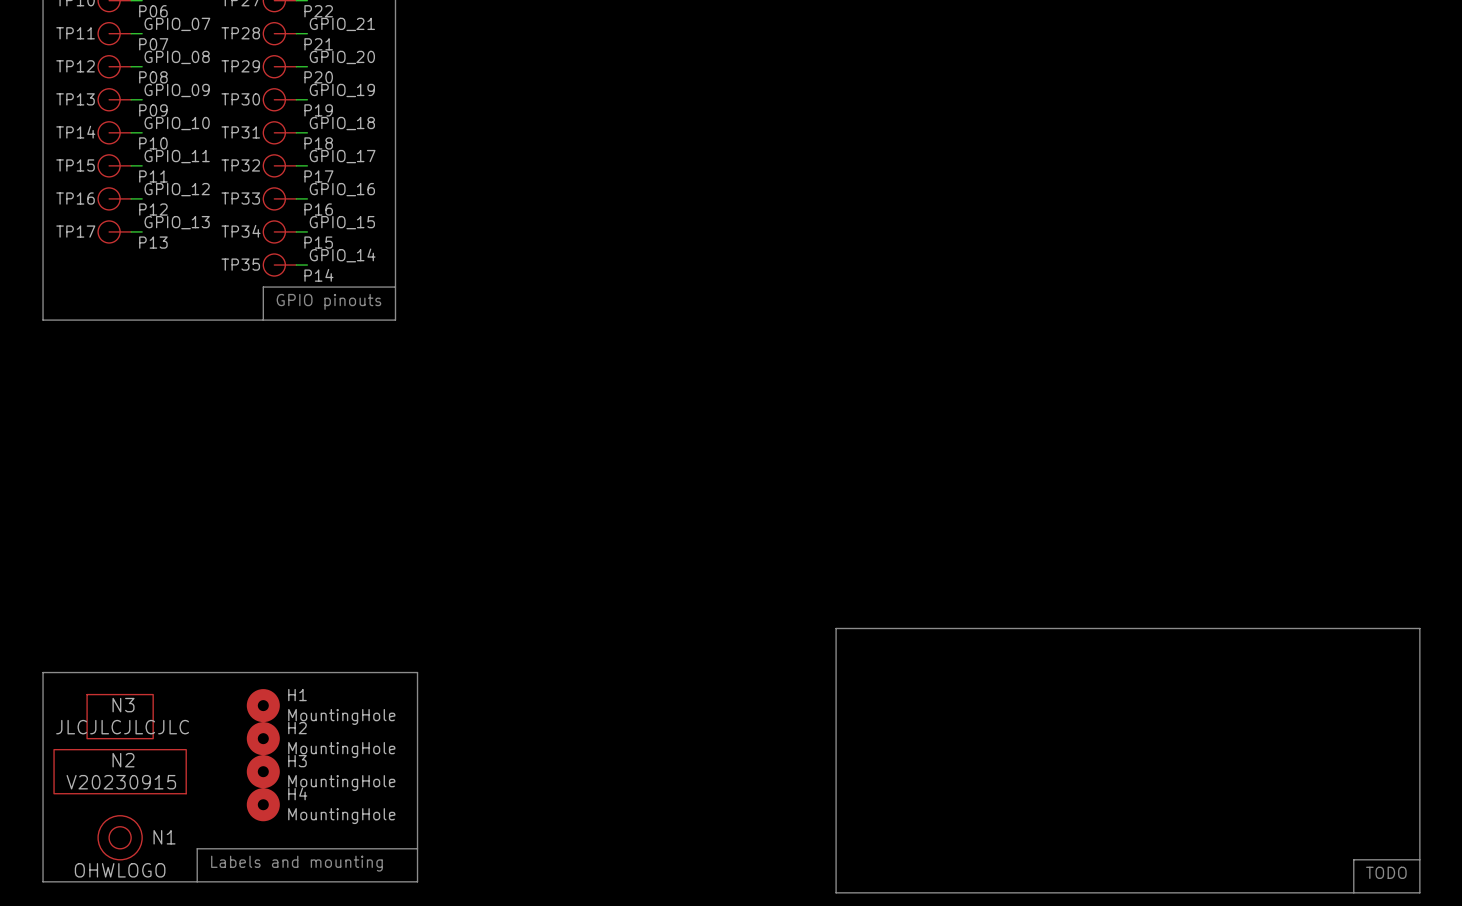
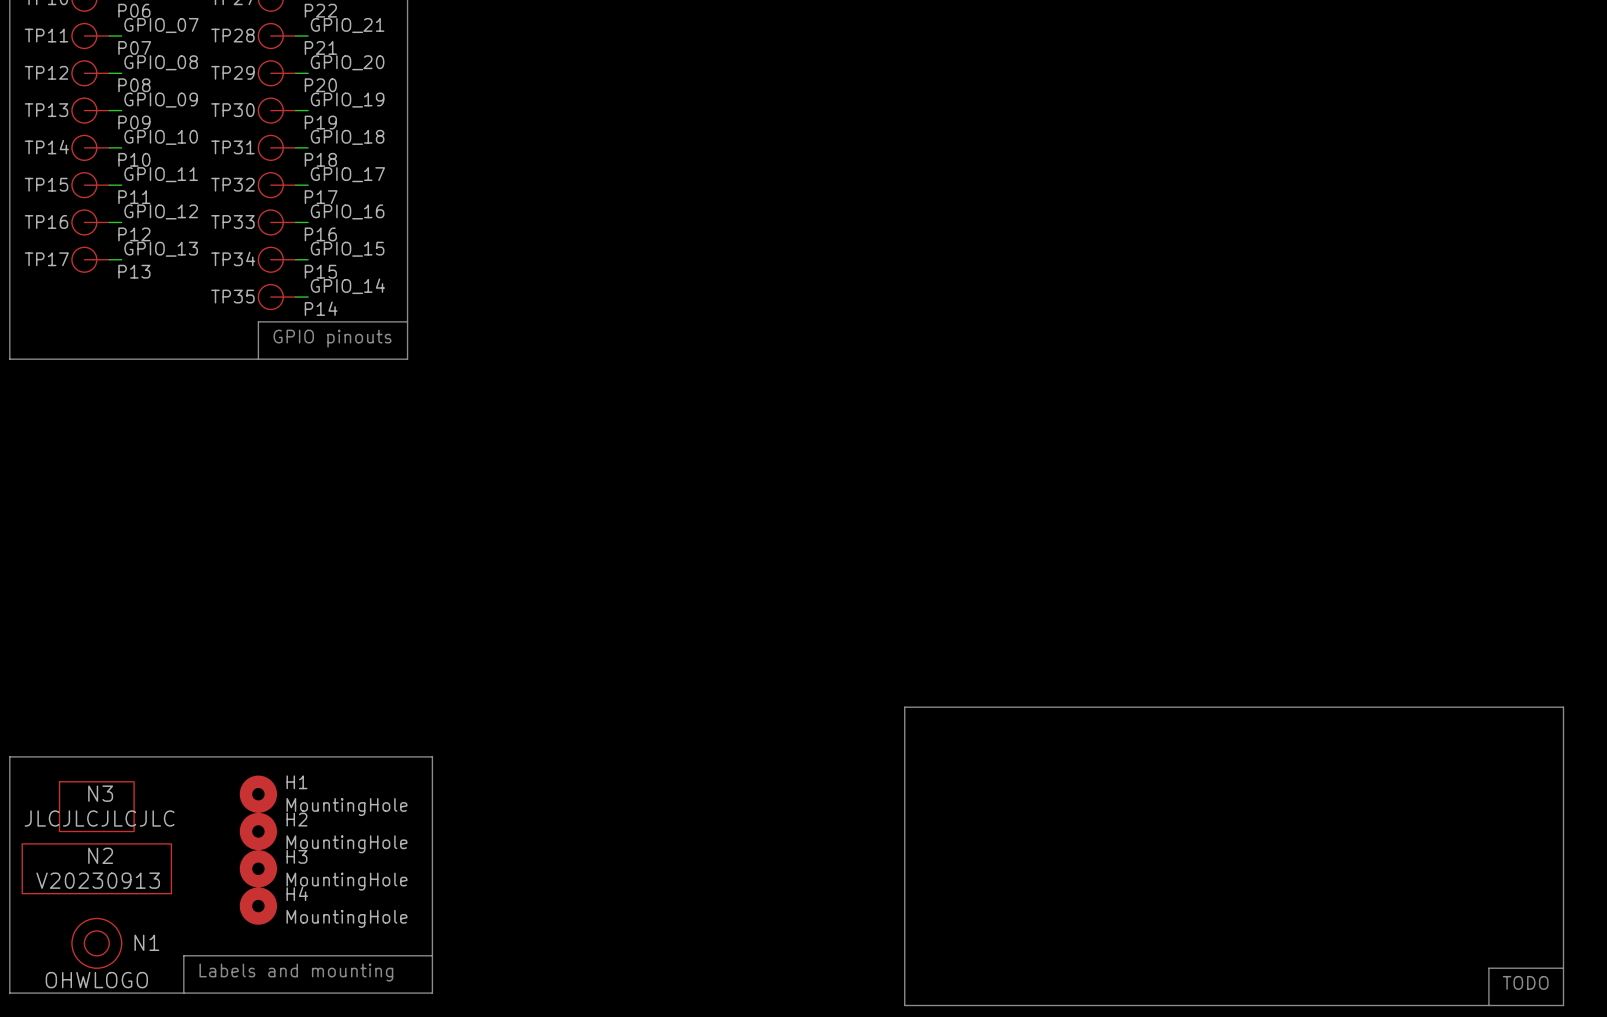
N2 value: V20230915 (121, 782) -> V20230913 (98, 880)

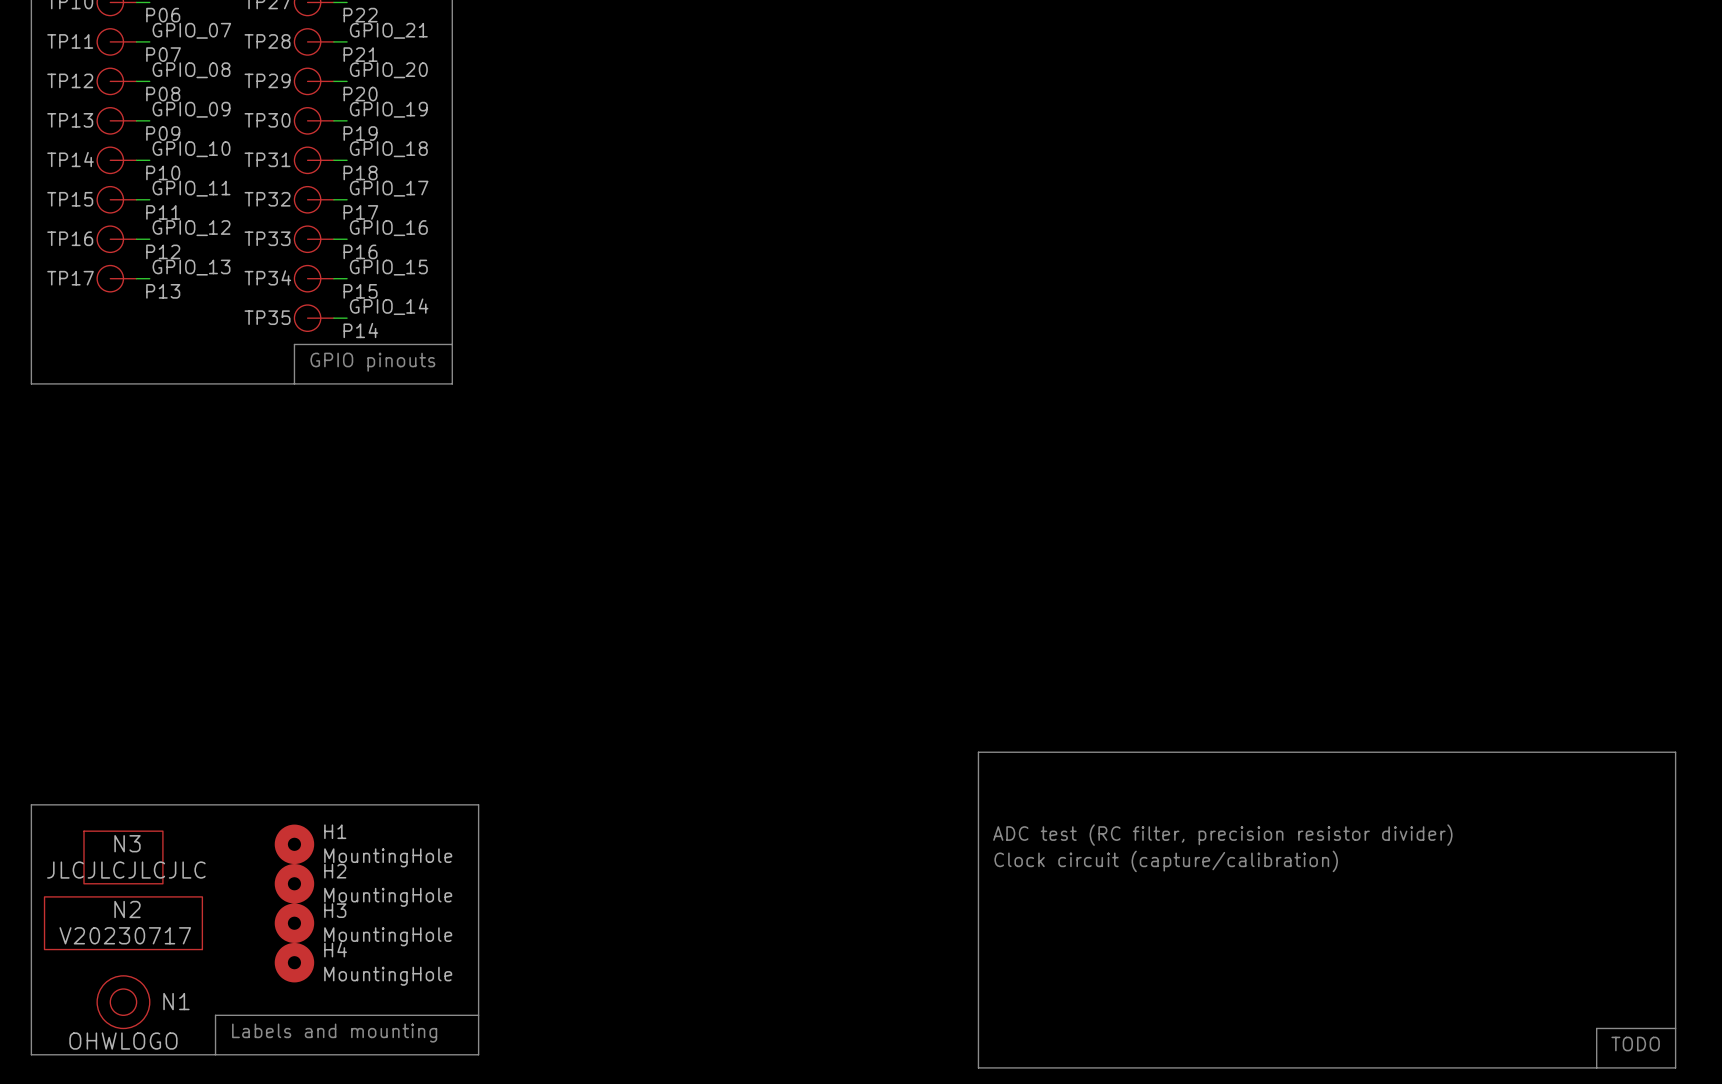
text: none -> ADC test (RC filter, precision resistor divider) (1222, 835)
text: none -> Clock circuit (capture/calibration) (1166, 861)
N2 value: V20230913 (98, 880) -> V20230717 (125, 935)

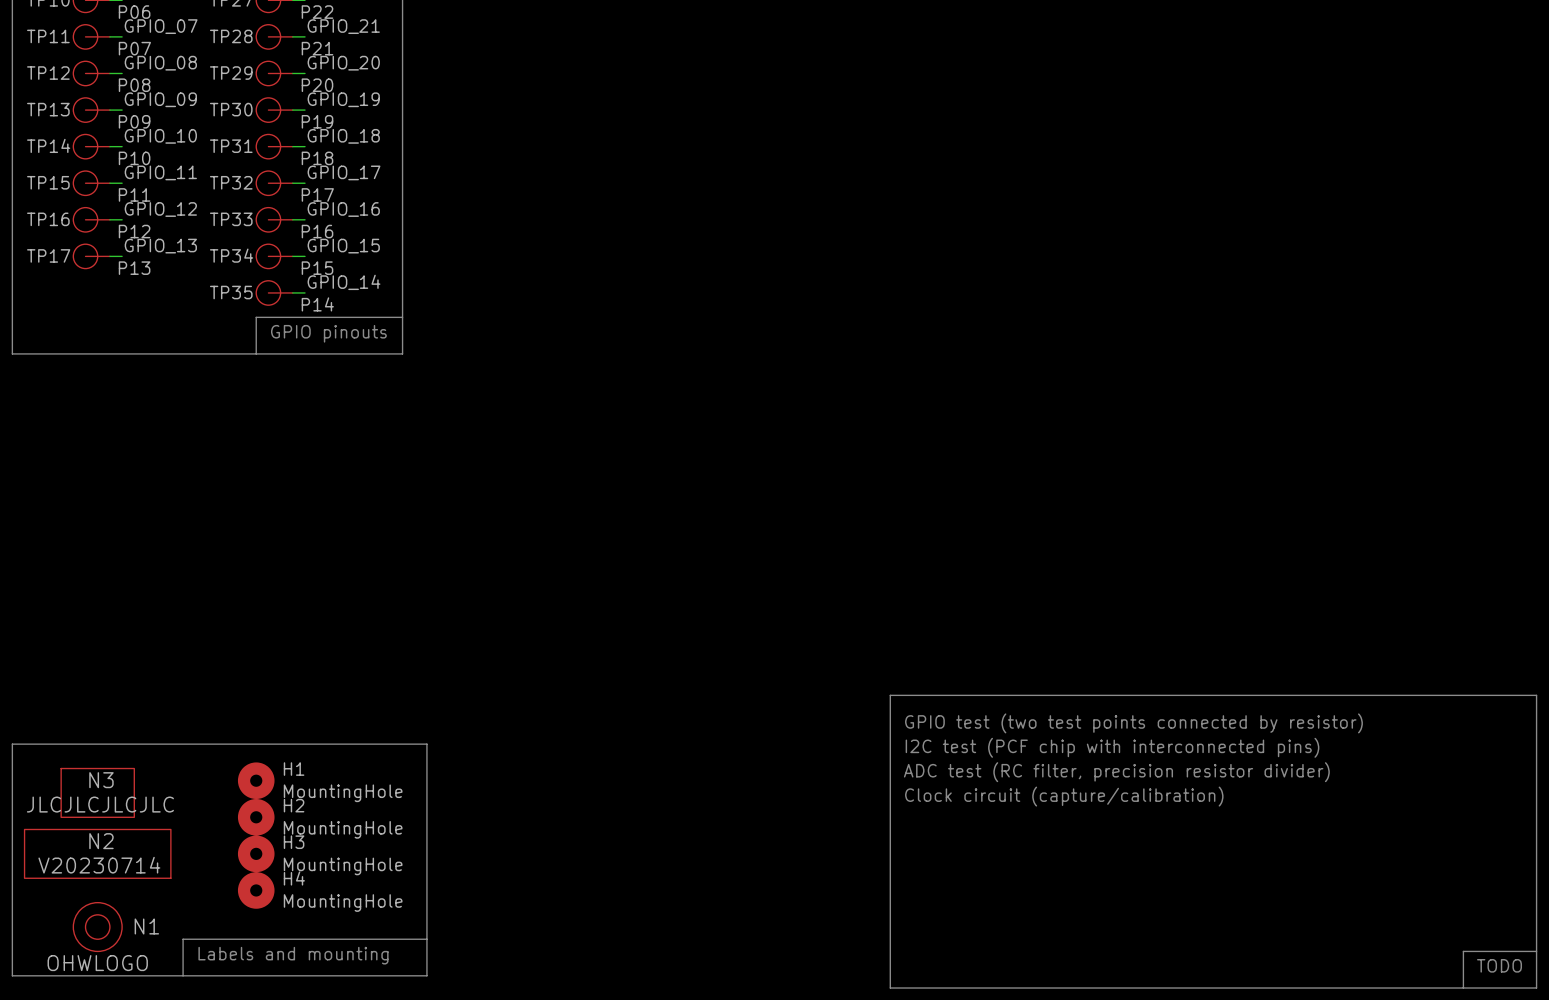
text: none -> GPIO test (two test points connected by resistor) (1133, 723)
text: none -> I2C test (PCF chip with interconnected pins) (1112, 747)
N2 value: V20230717 (125, 935) -> V20230714 (99, 865)

